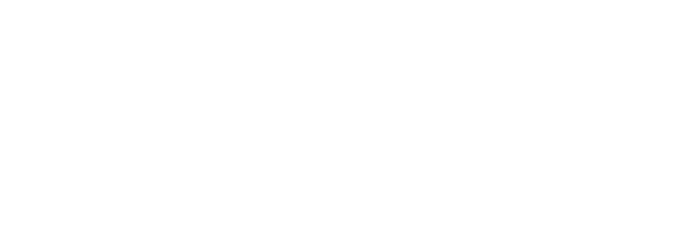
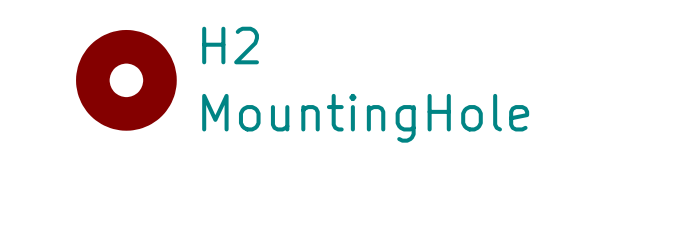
H2: none -> MountingHole (126, 80)

